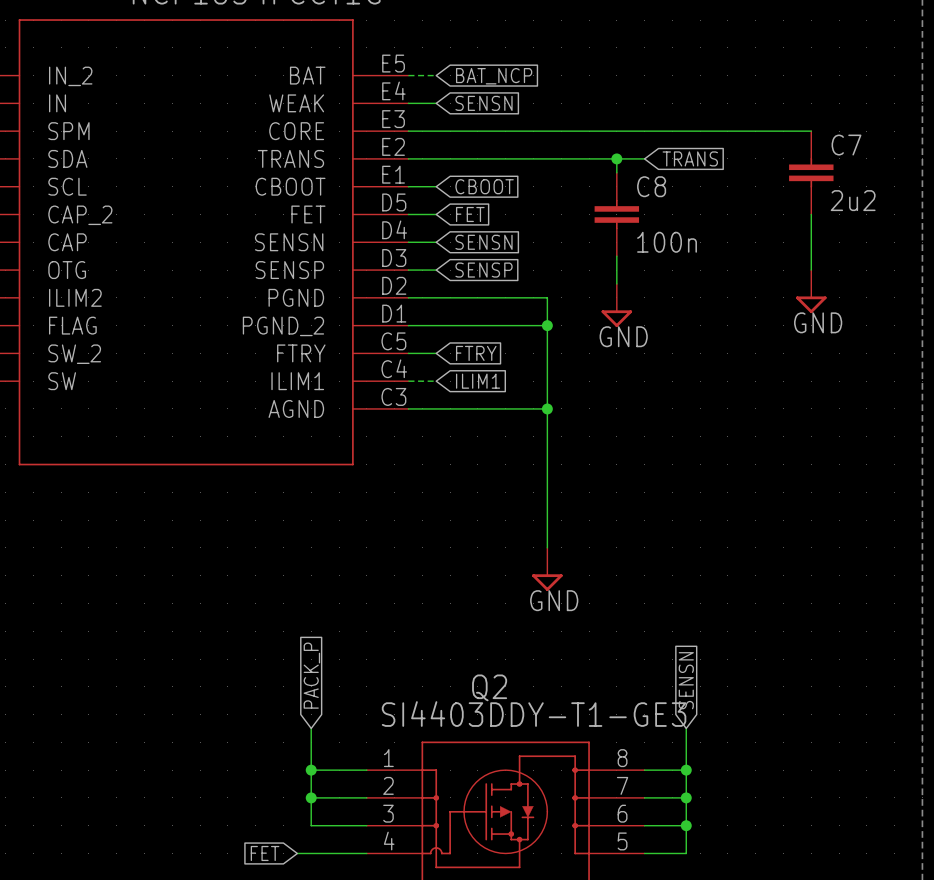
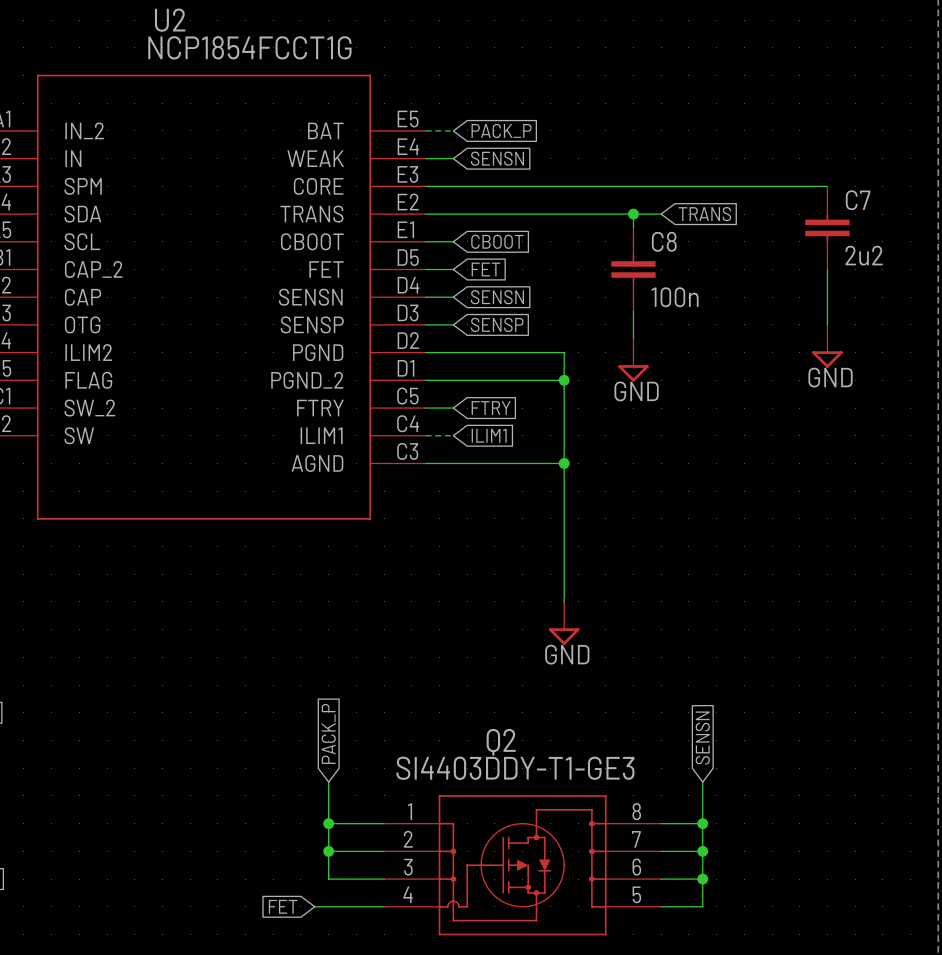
global label: BAT_NCP (494, 76) -> PACK_P (501, 130)

